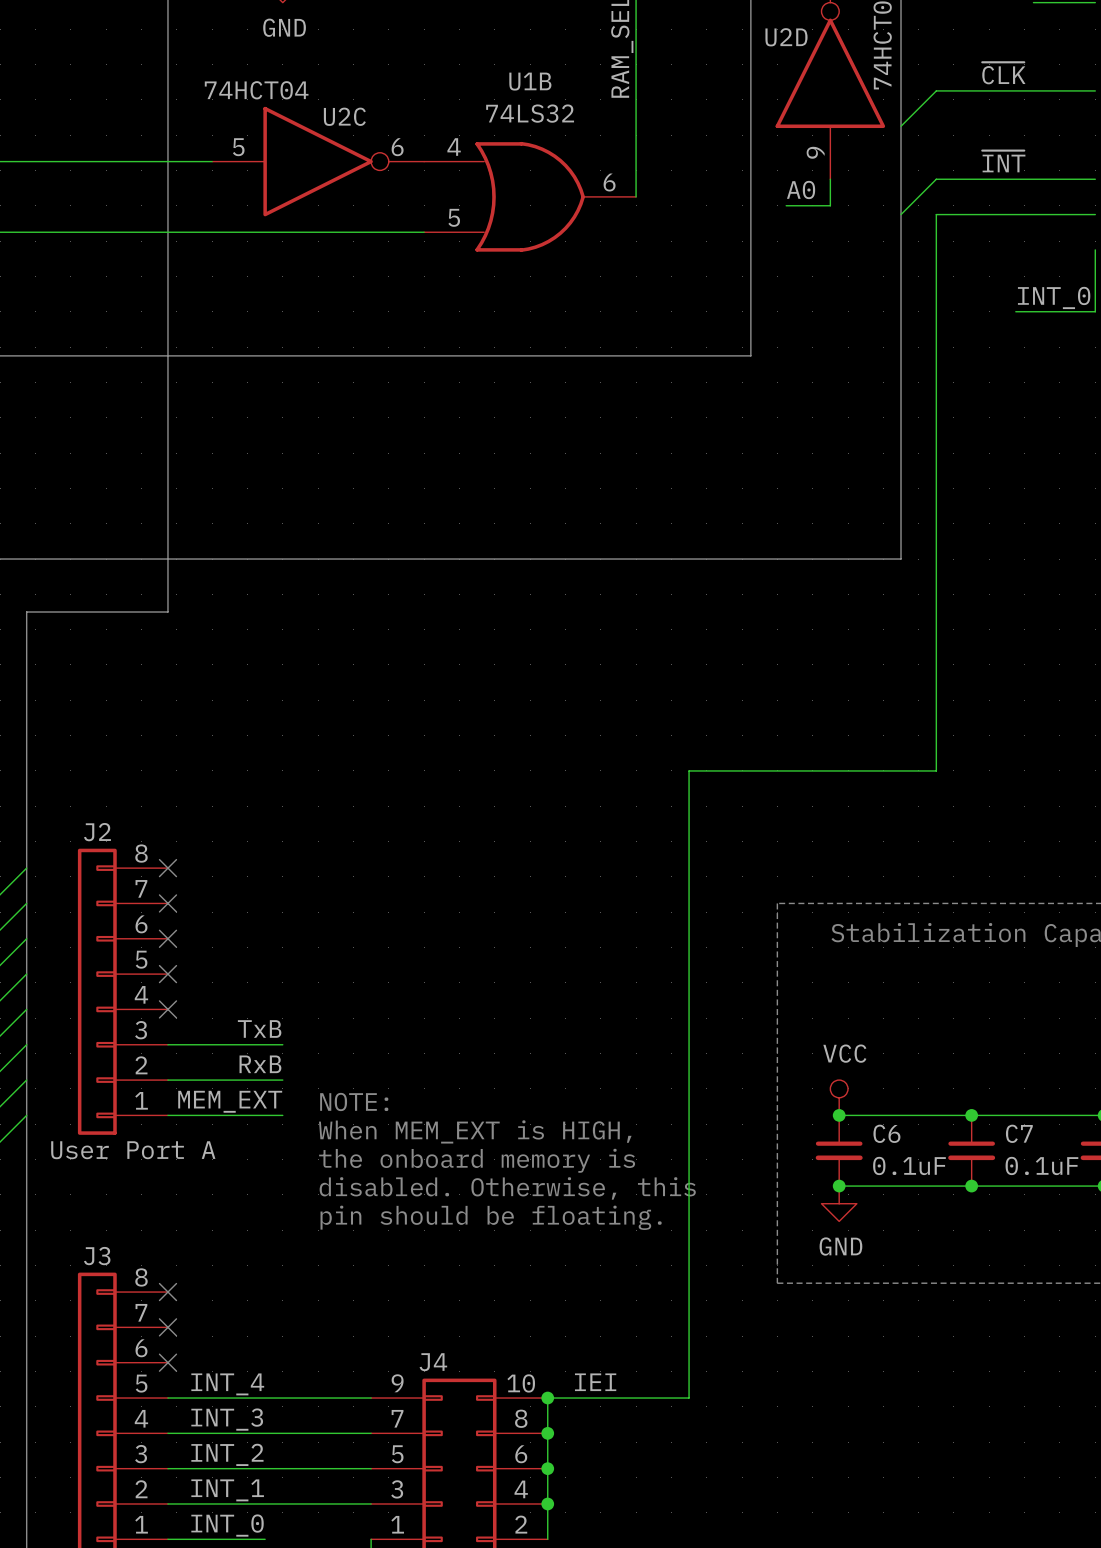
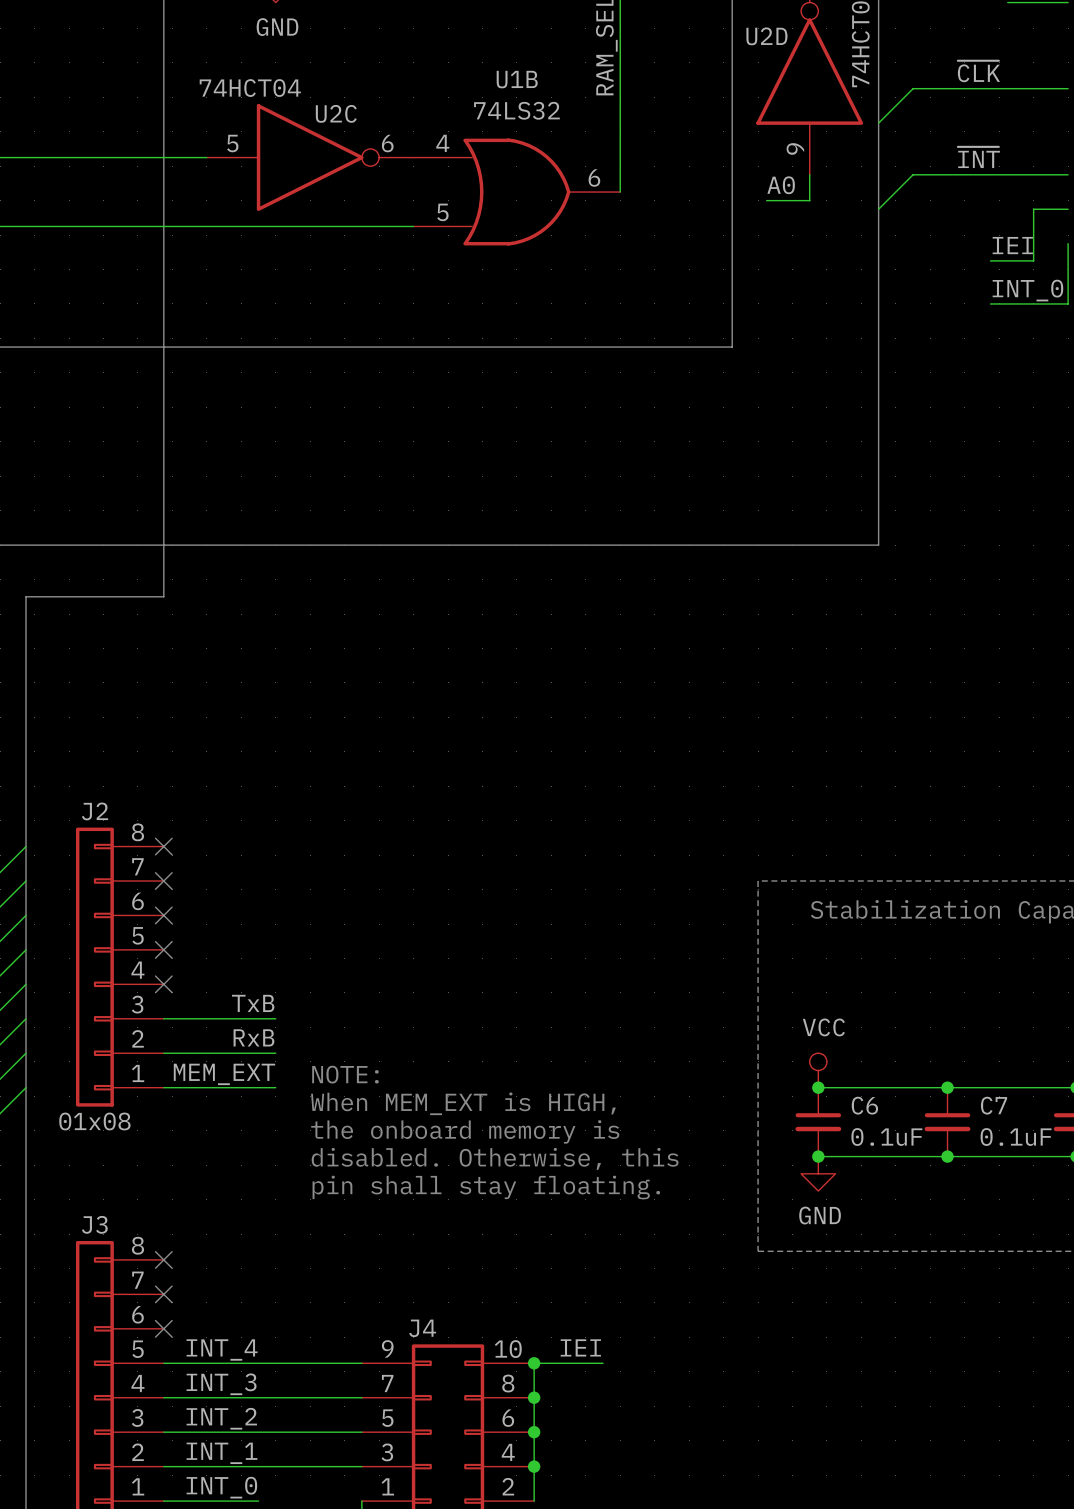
wire: (1059, 214) (936, 214) (936, 770) (689, 770) (689, 1398) (618, 1398) -> (1033, 209) (1033, 260) (990, 260)
label: none -> IEI (1012, 245)
J2 value: User Port A (133, 1150) -> 01x08 (94, 1121)
text: pin should be floating. (491, 1217) -> pin shall stay floating. (486, 1187)

